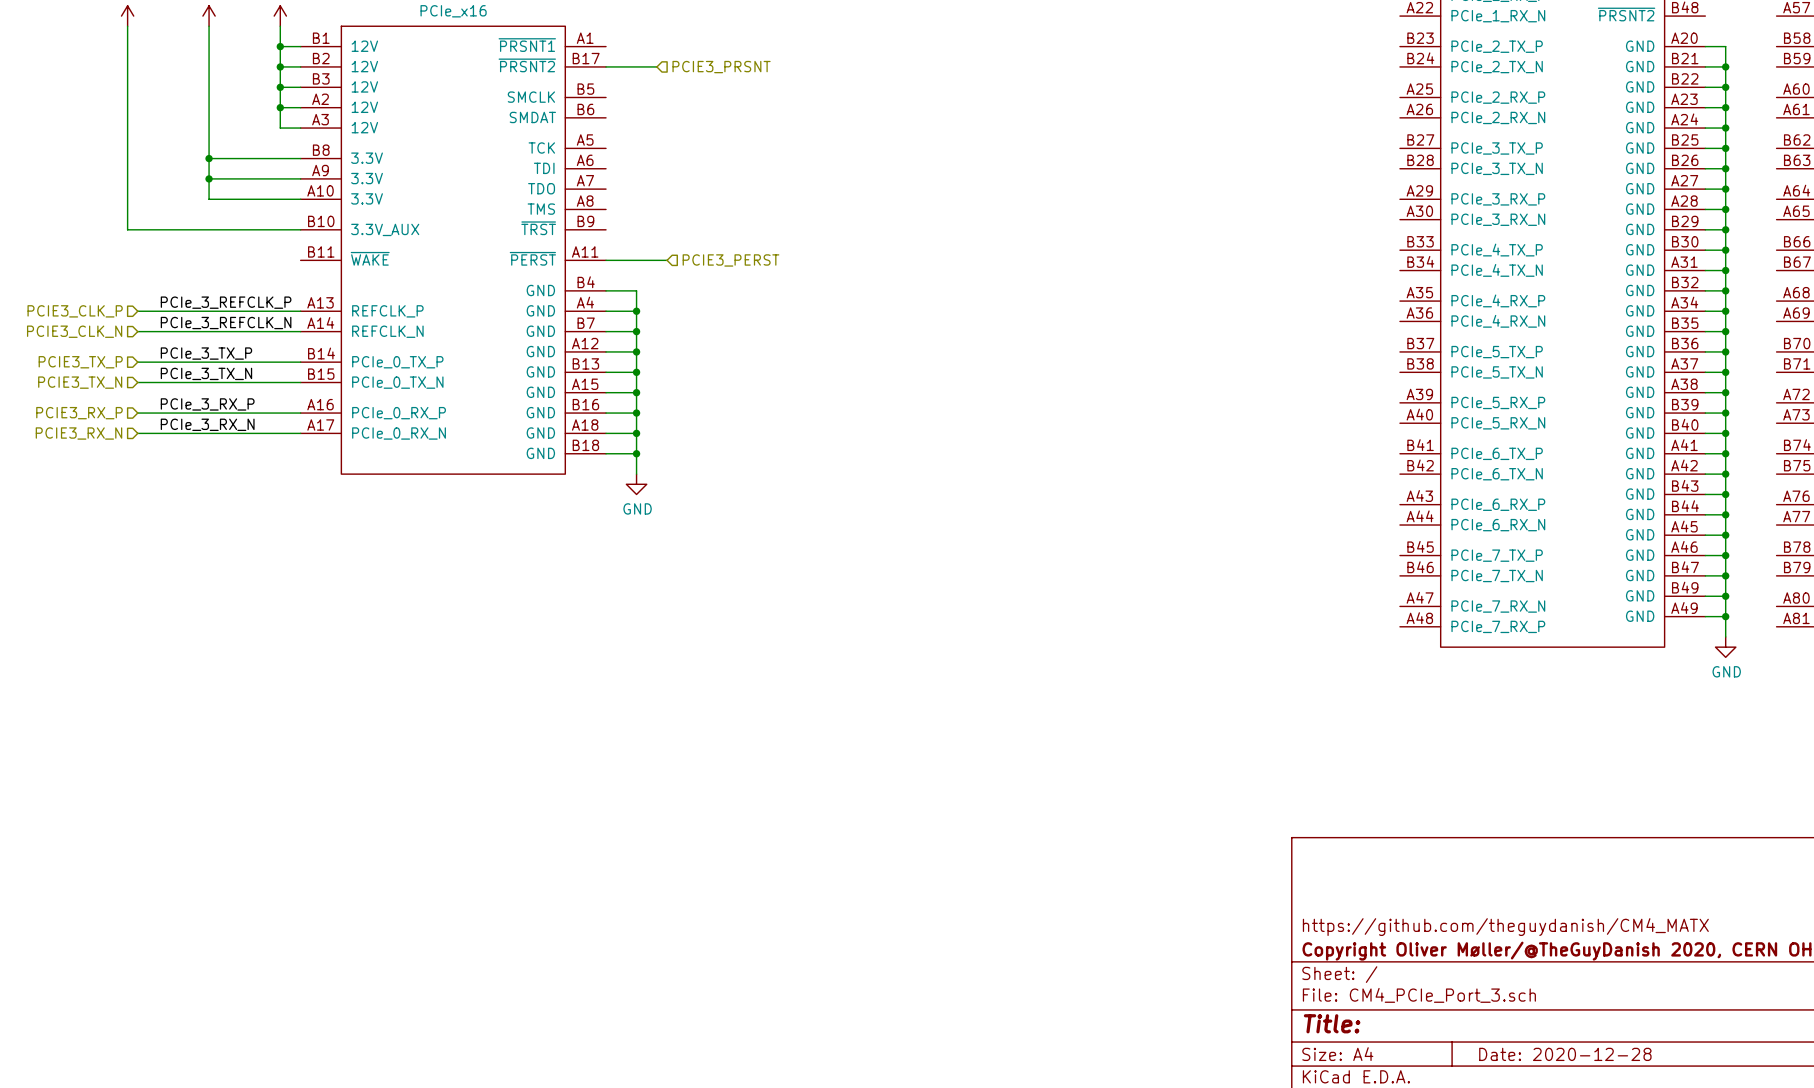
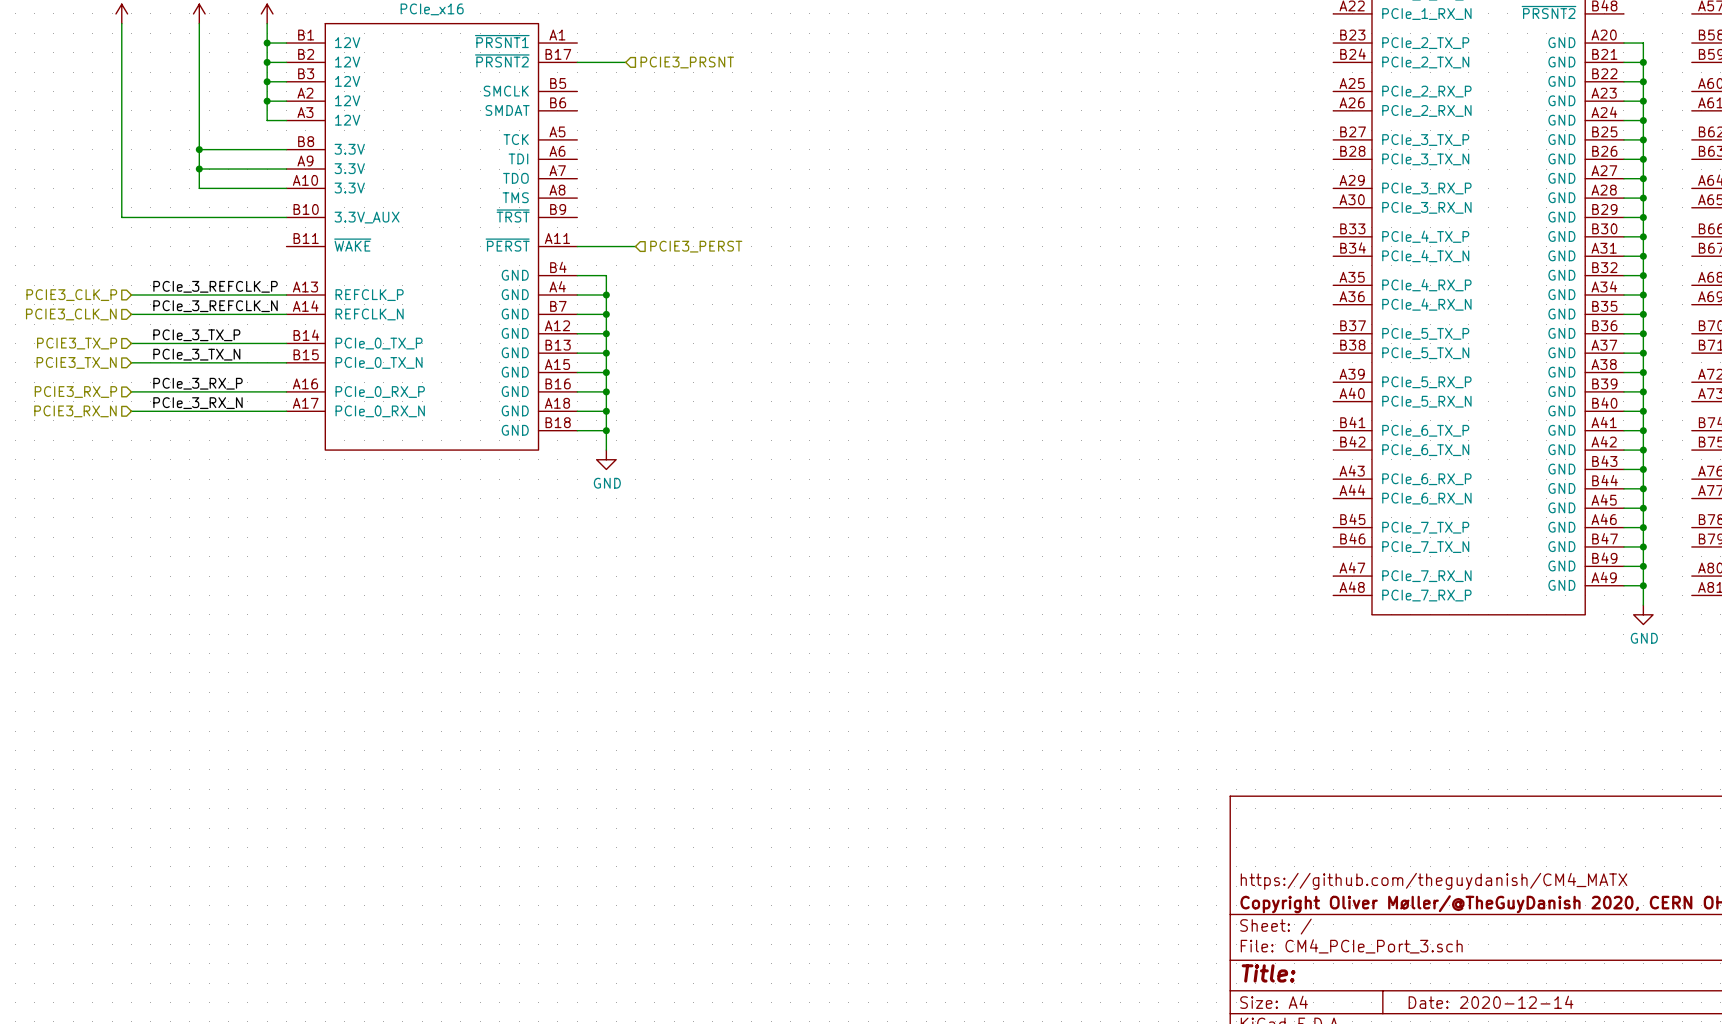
title block: Date: 2020-12-28 (1565, 1054) -> Date: 2020-12-14 (1490, 1002)

